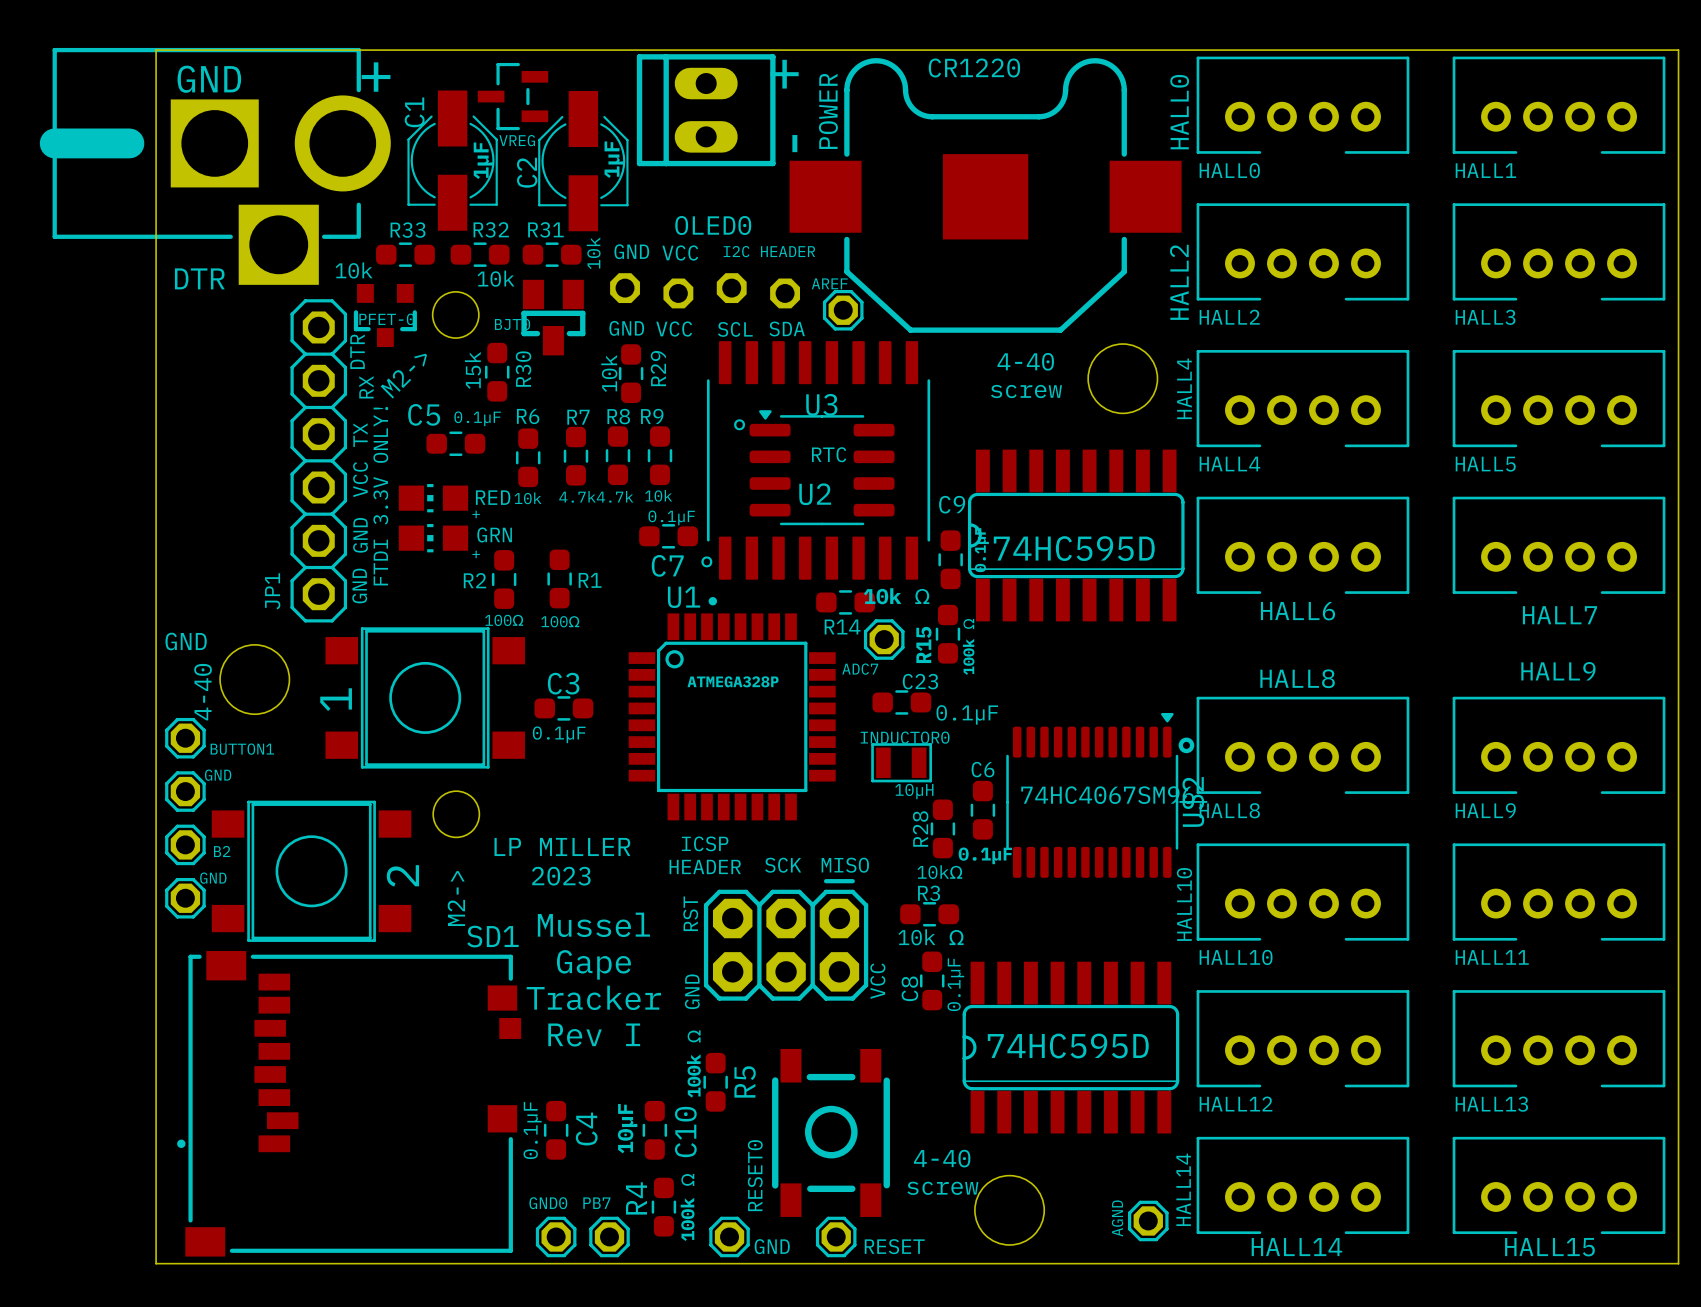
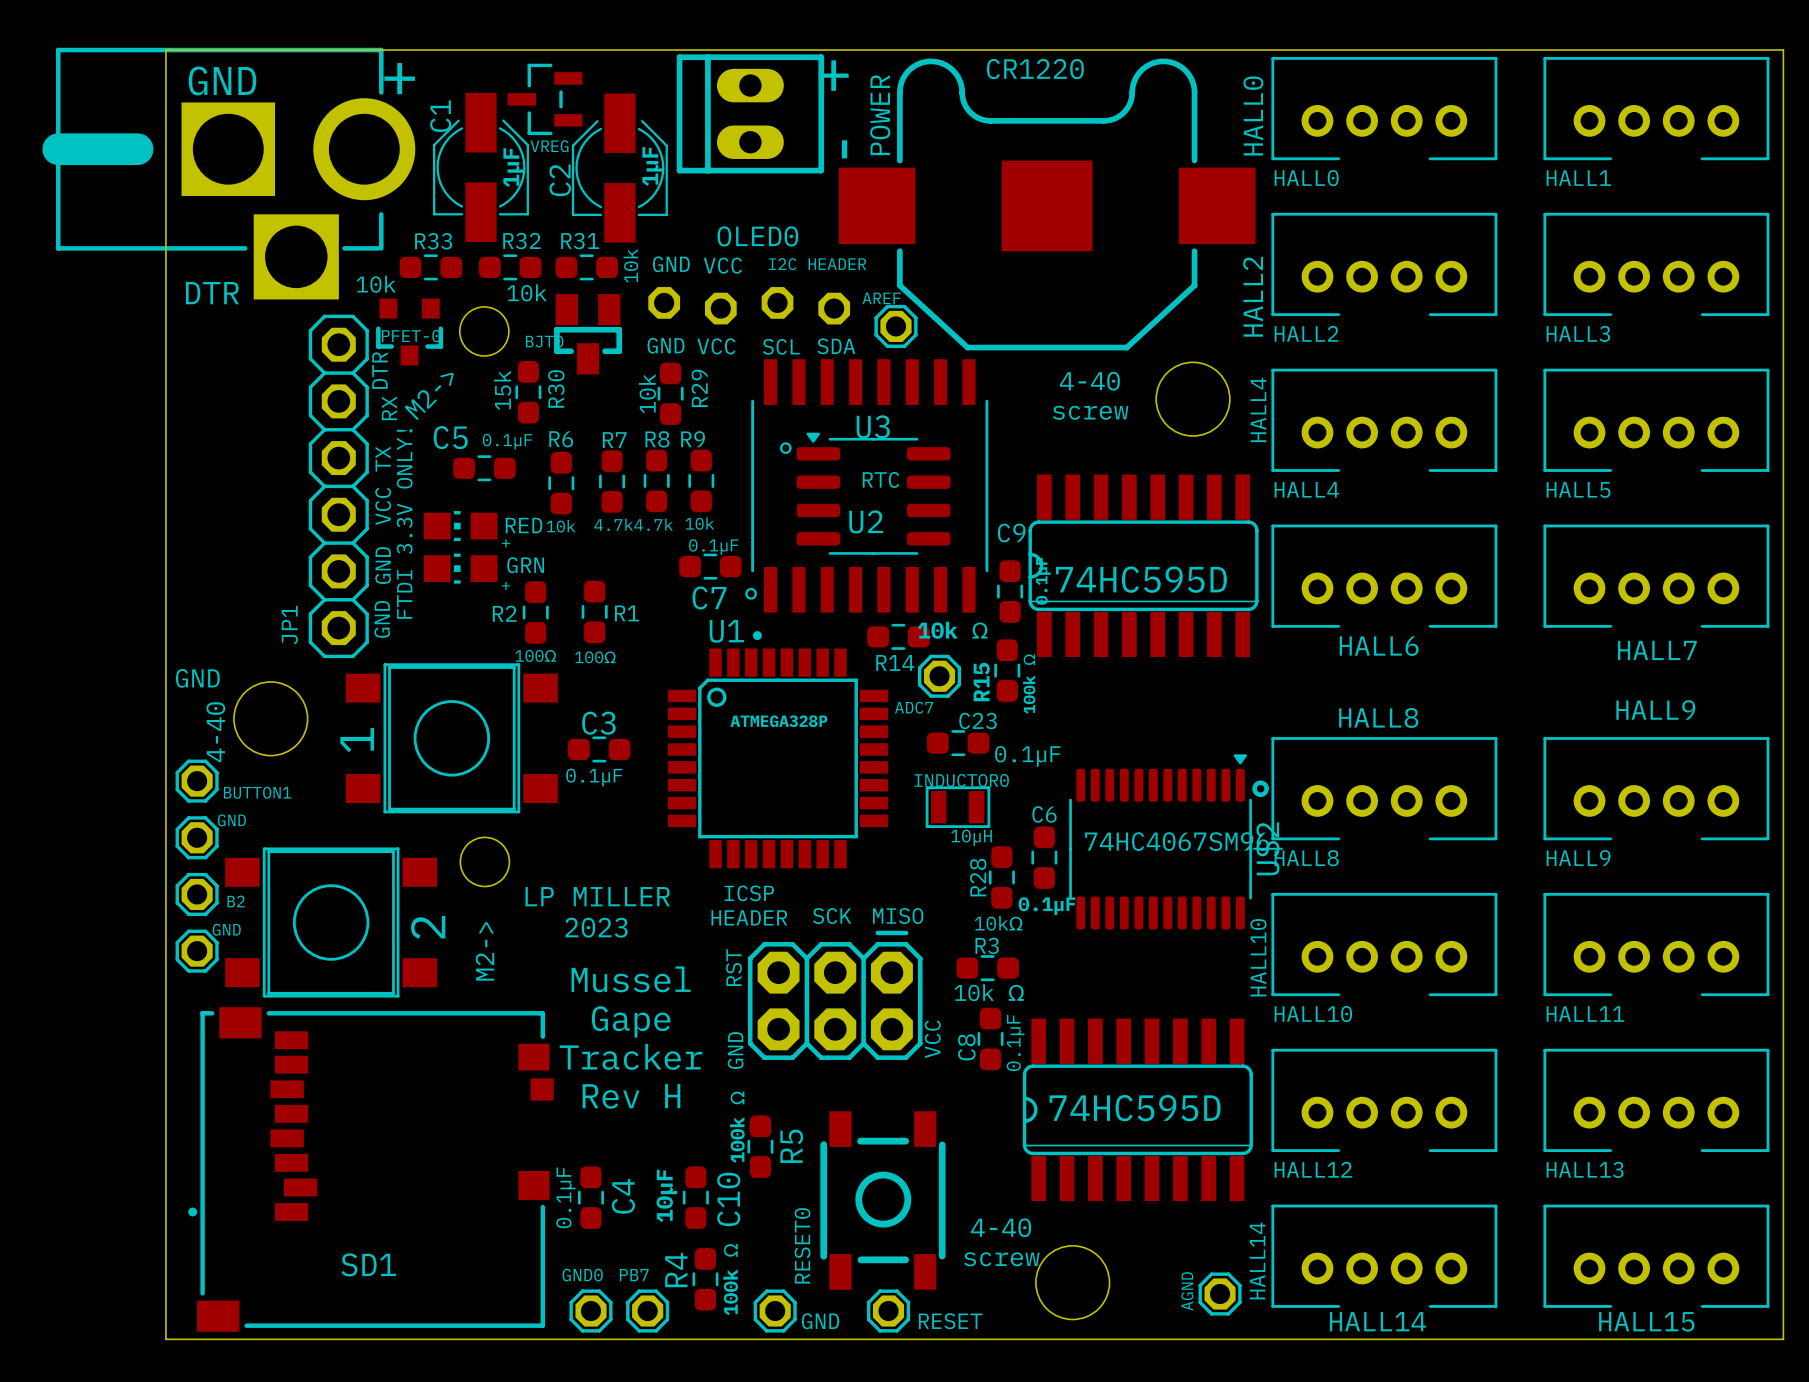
SD1 name position: SD1 (492, 936) -> SD1 (368, 1264)
text: Rev I (594, 1035) -> Rev H (631, 1096)

